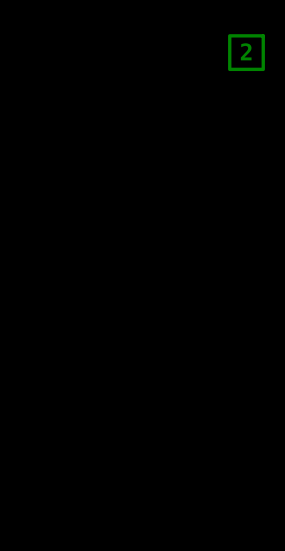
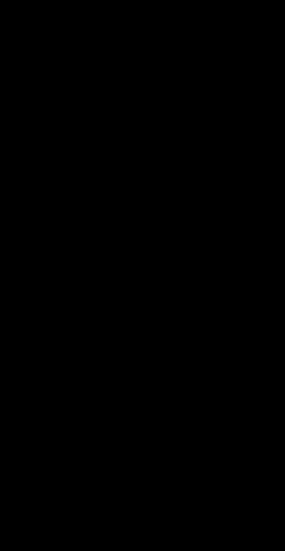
drawing: [228, 34, 265, 72] -> none

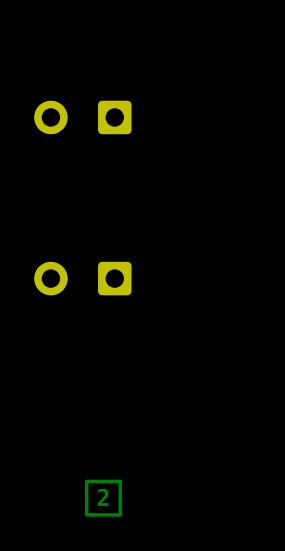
part: none -> (82, 117)
part: none -> (82, 278)
drawing: none -> [85, 479, 122, 517]

